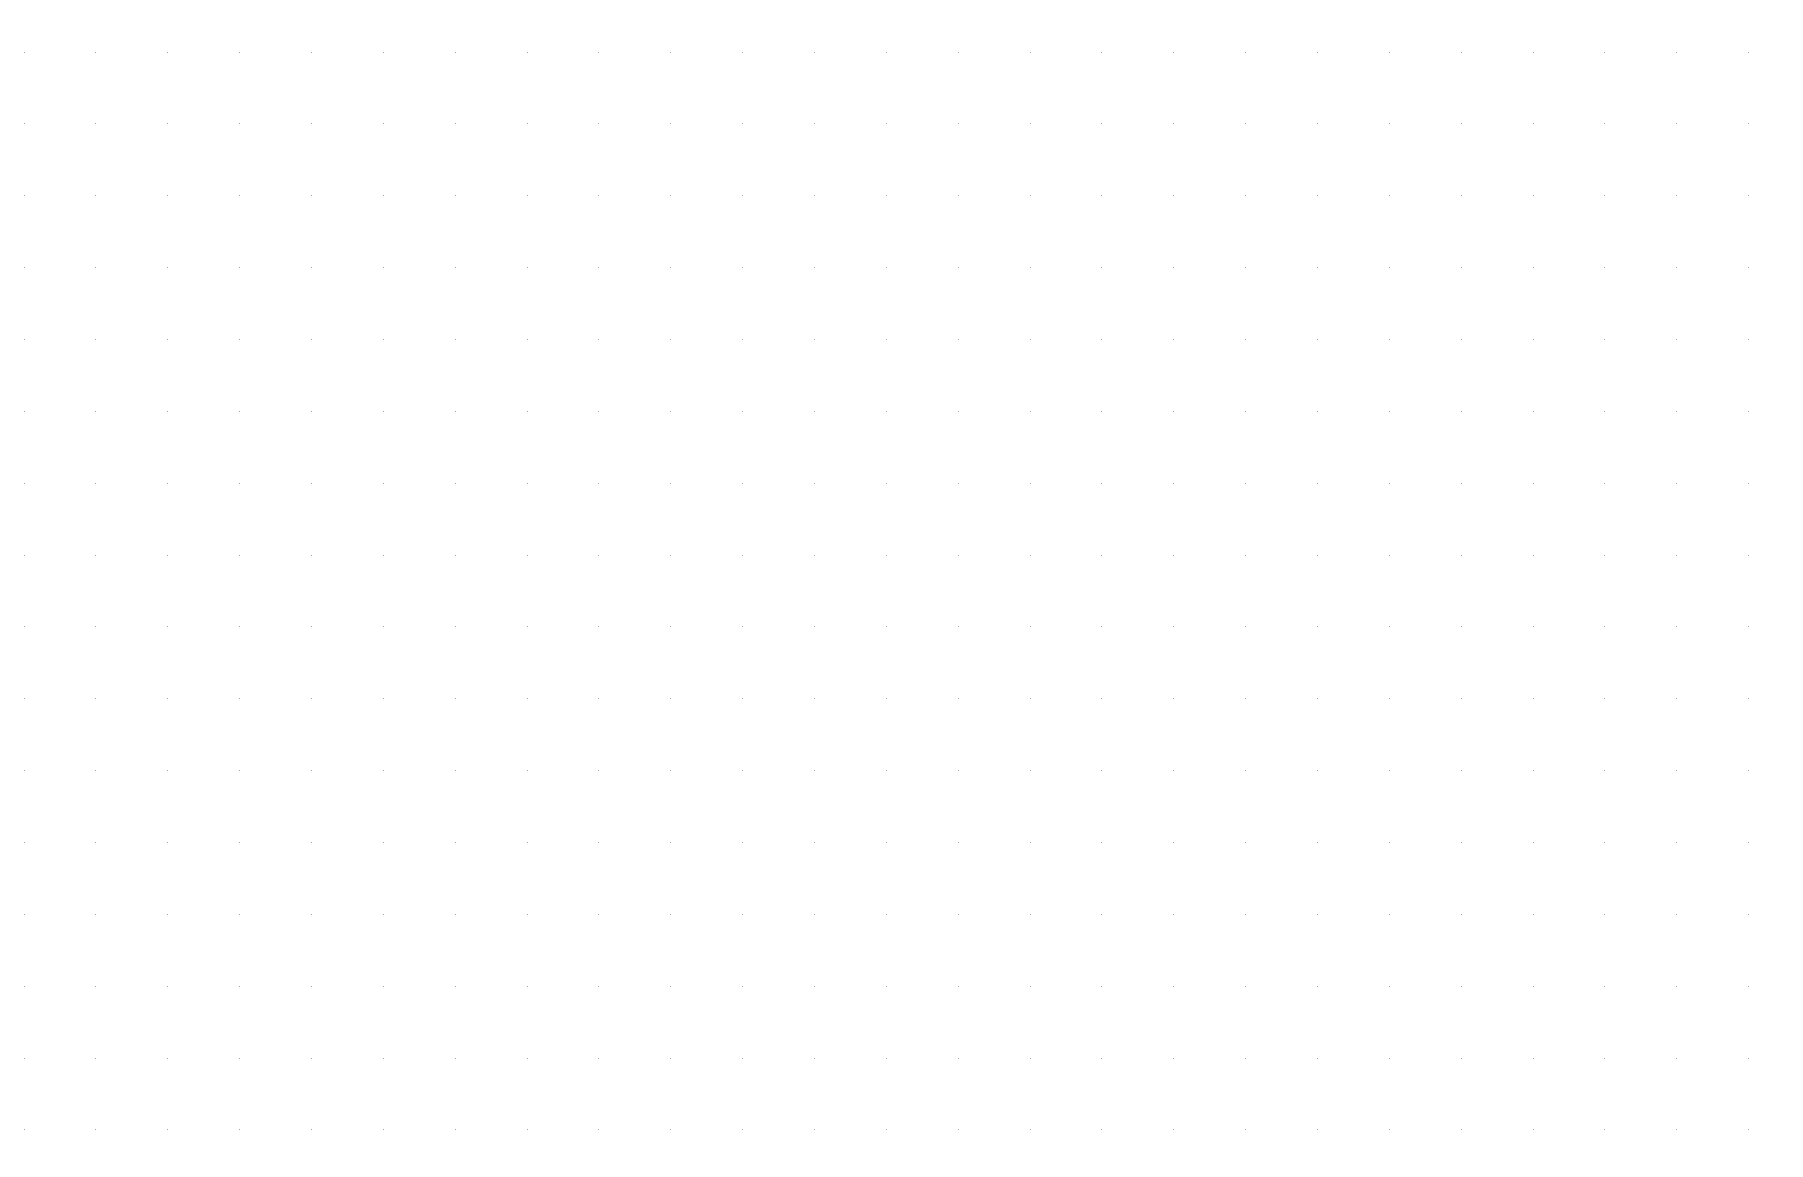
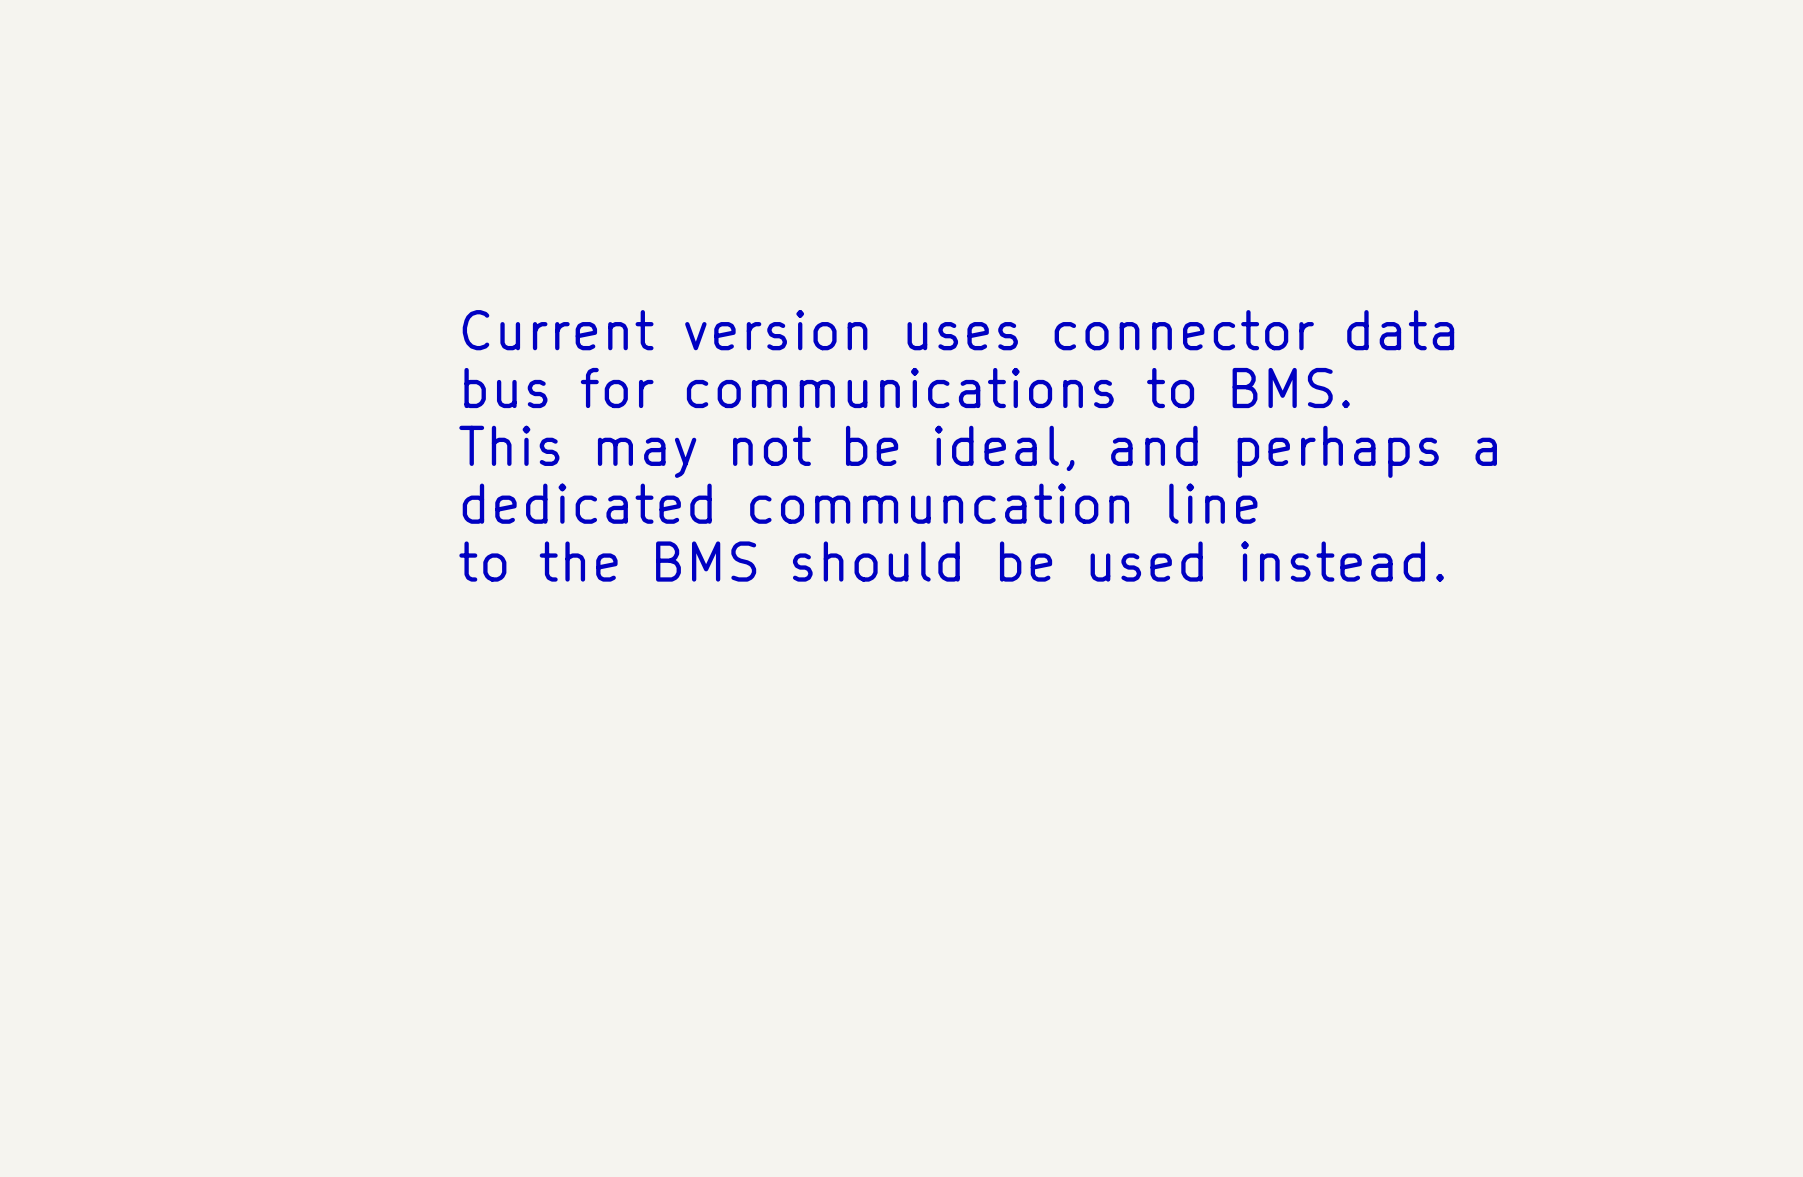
text: none -> Current version uses connector data (958, 330)
text: none -> bus for communications to BMS. (907, 388)
text: none -> This may not be ideal, and perhaps a (978, 451)
text: none -> dedicated communcation line (860, 503)
text: none -> to the BMS should be used instead. (951, 561)

